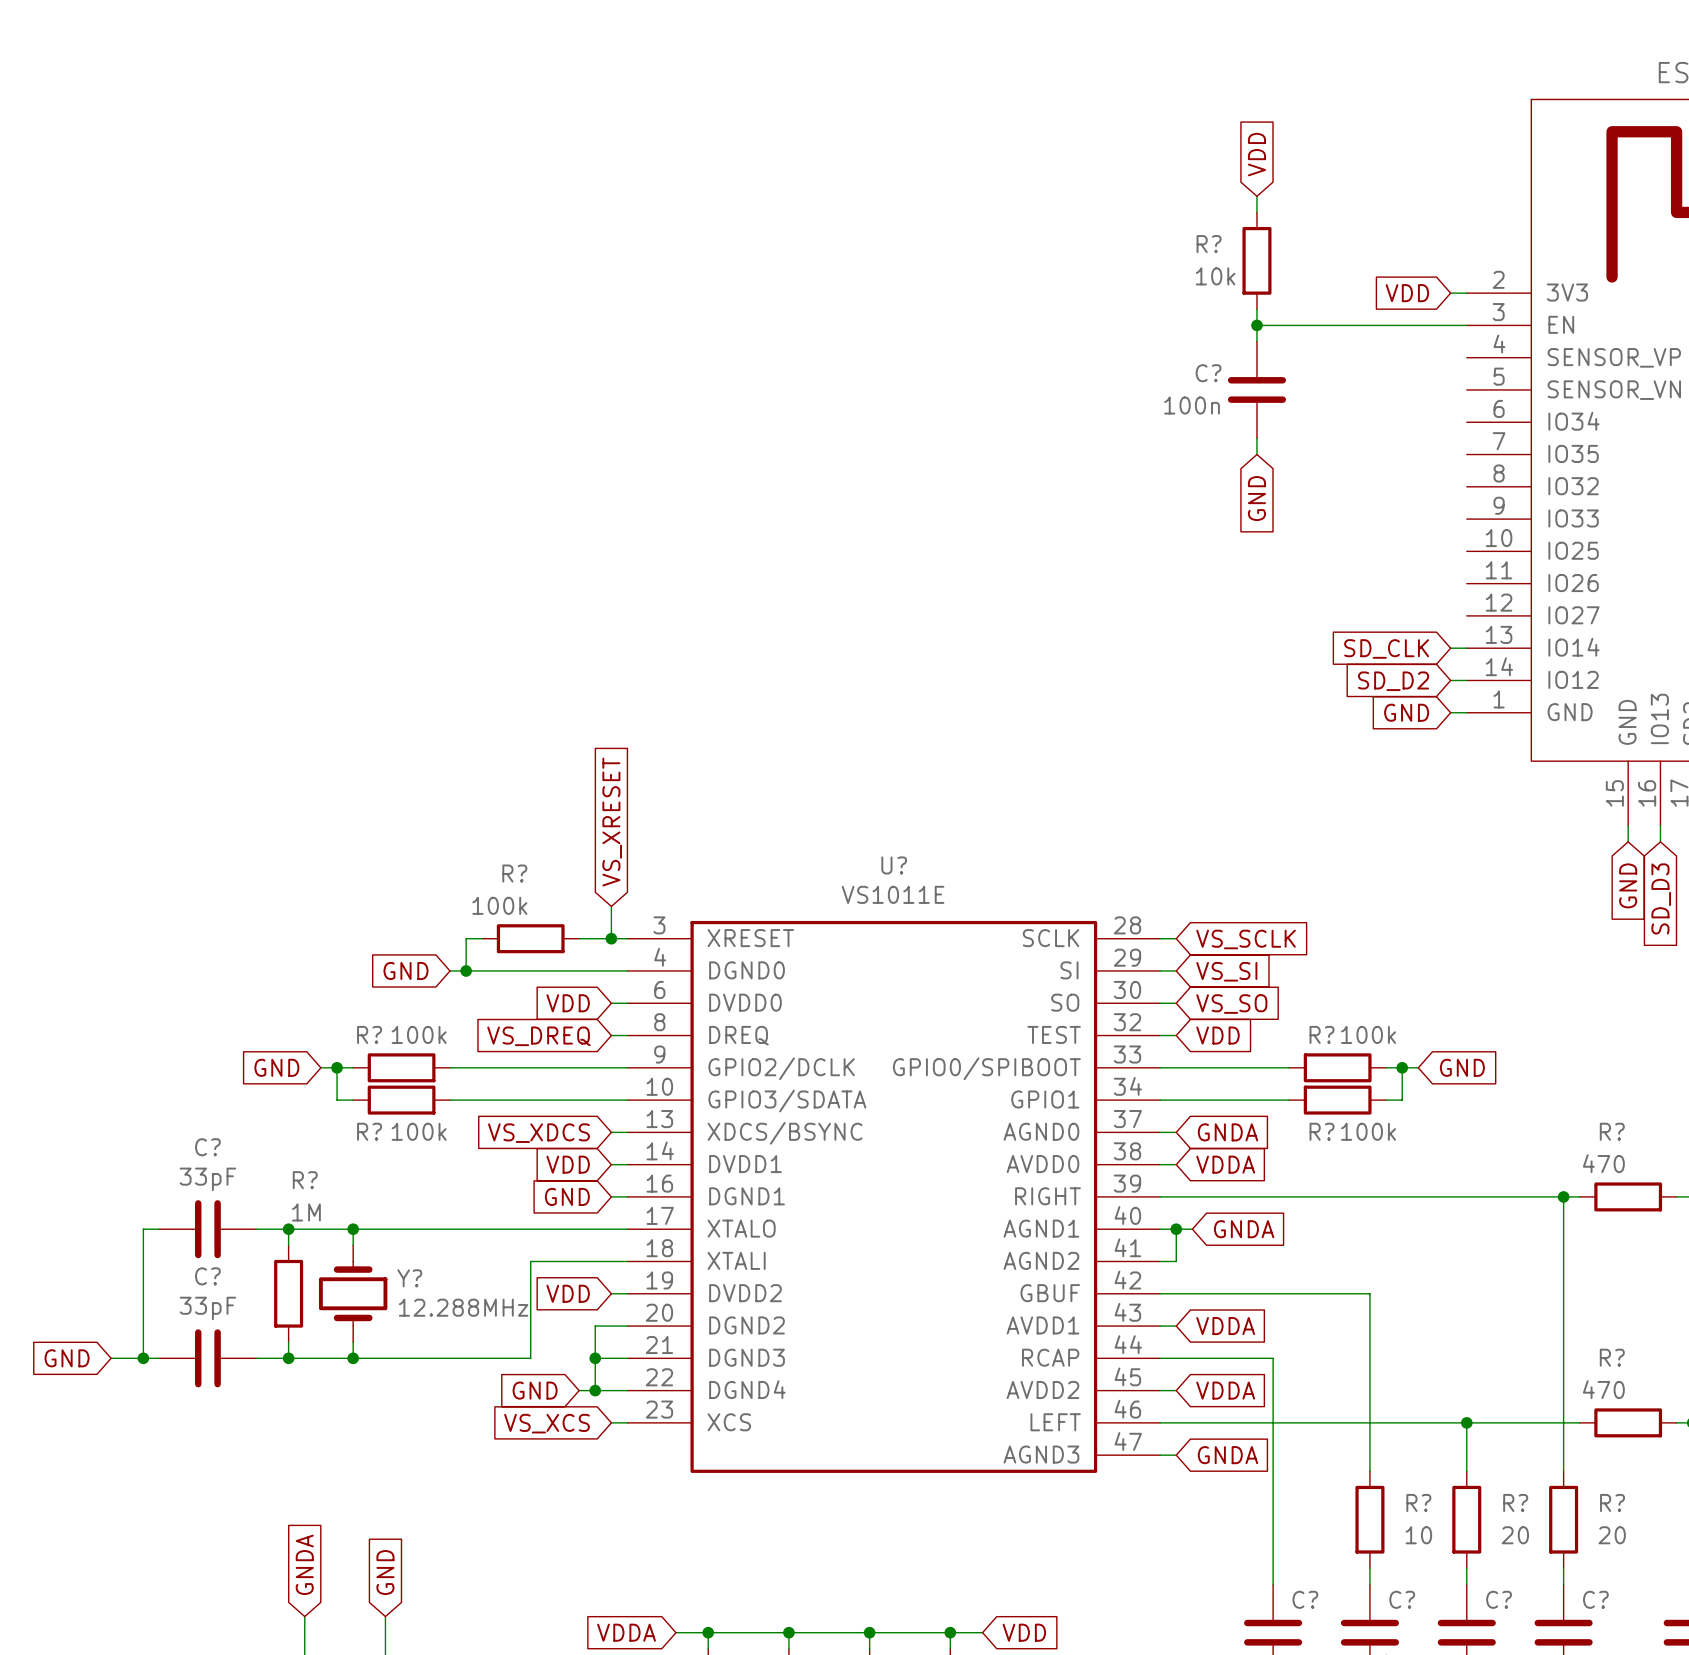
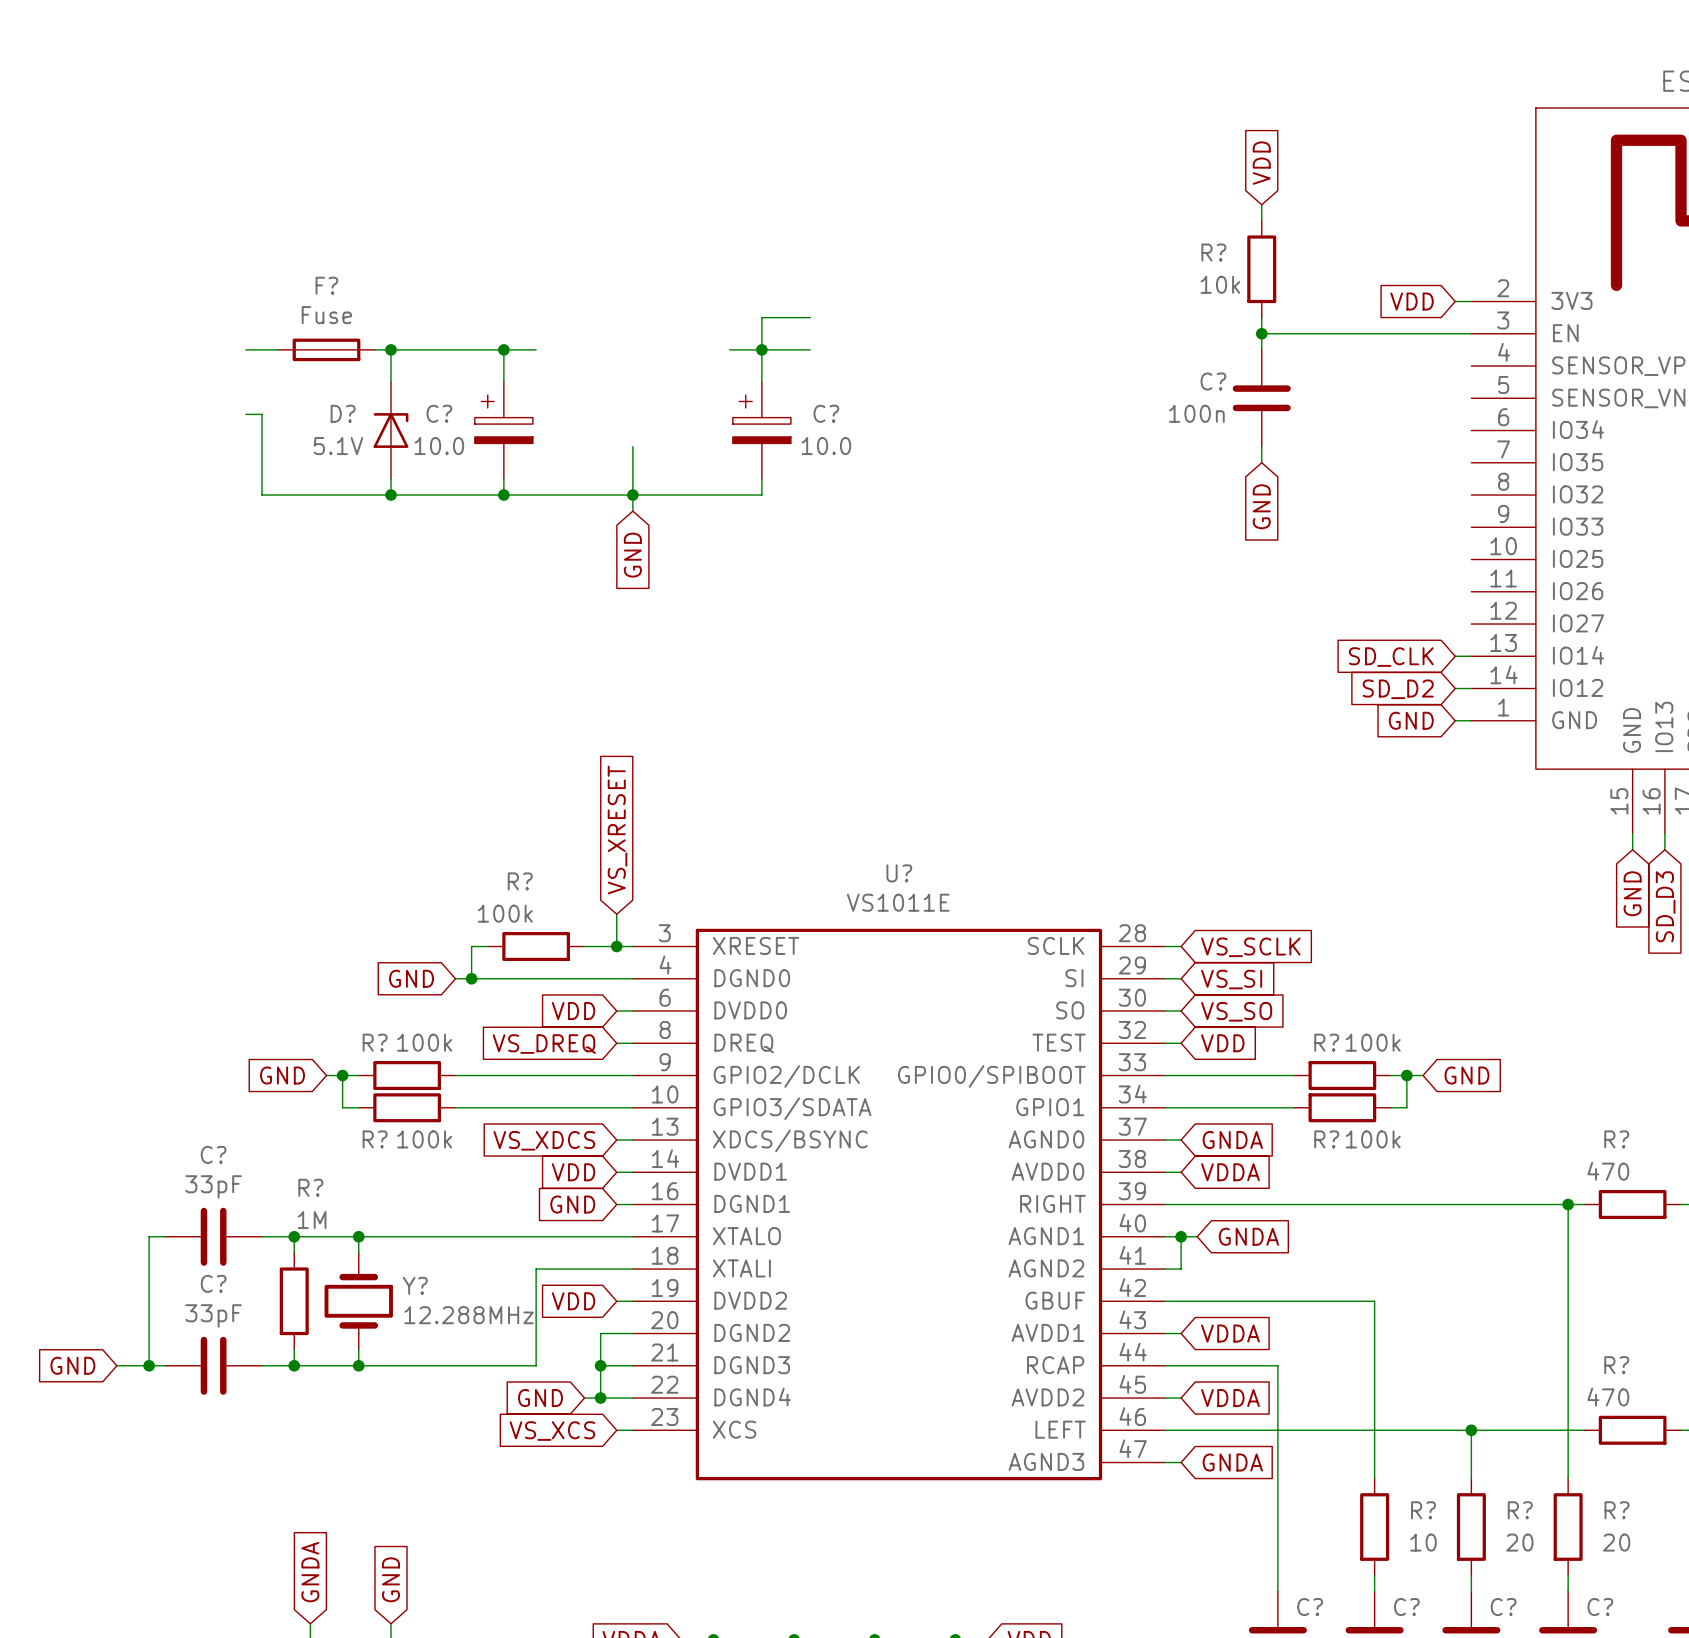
wire: none -> (810, 317) (761, 317) (761, 382)
wire: none -> (245, 349) (278, 349)
F?: none -> Fuse (326, 349)
wire: none -> (374, 349) (536, 349)
wire: none -> (390, 349) (390, 382)
junction: none -> (390, 349)
wire: none -> (503, 349) (503, 382)
junction: none -> (503, 349)
wire: none -> (729, 349) (810, 349)
junction: none -> (761, 349)
wire: none -> (245, 414) (261, 414) (261, 495) (761, 495) (761, 478)
D?: none -> 5.1V (390, 430)
C?: none -> 10.0 (503, 430)
C?: none -> 10.0 (761, 430)
wire: none -> (632, 446) (632, 511)
wire: none -> (390, 478) (390, 495)
wire: none -> (503, 478) (503, 495)
junction: none -> (390, 495)
junction: none -> (503, 495)
junction: none -> (632, 495)
global label: none -> GND (632, 555)

